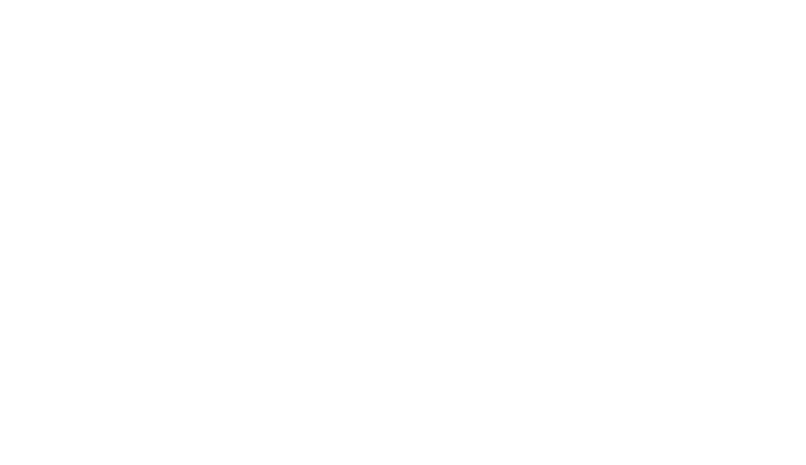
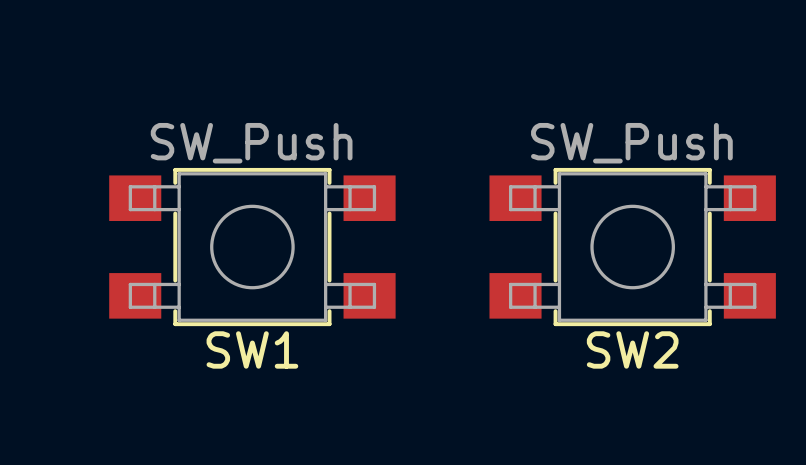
SW1: none -> SW_Push (252, 247)
SW2: none -> SW_Push (632, 247)

